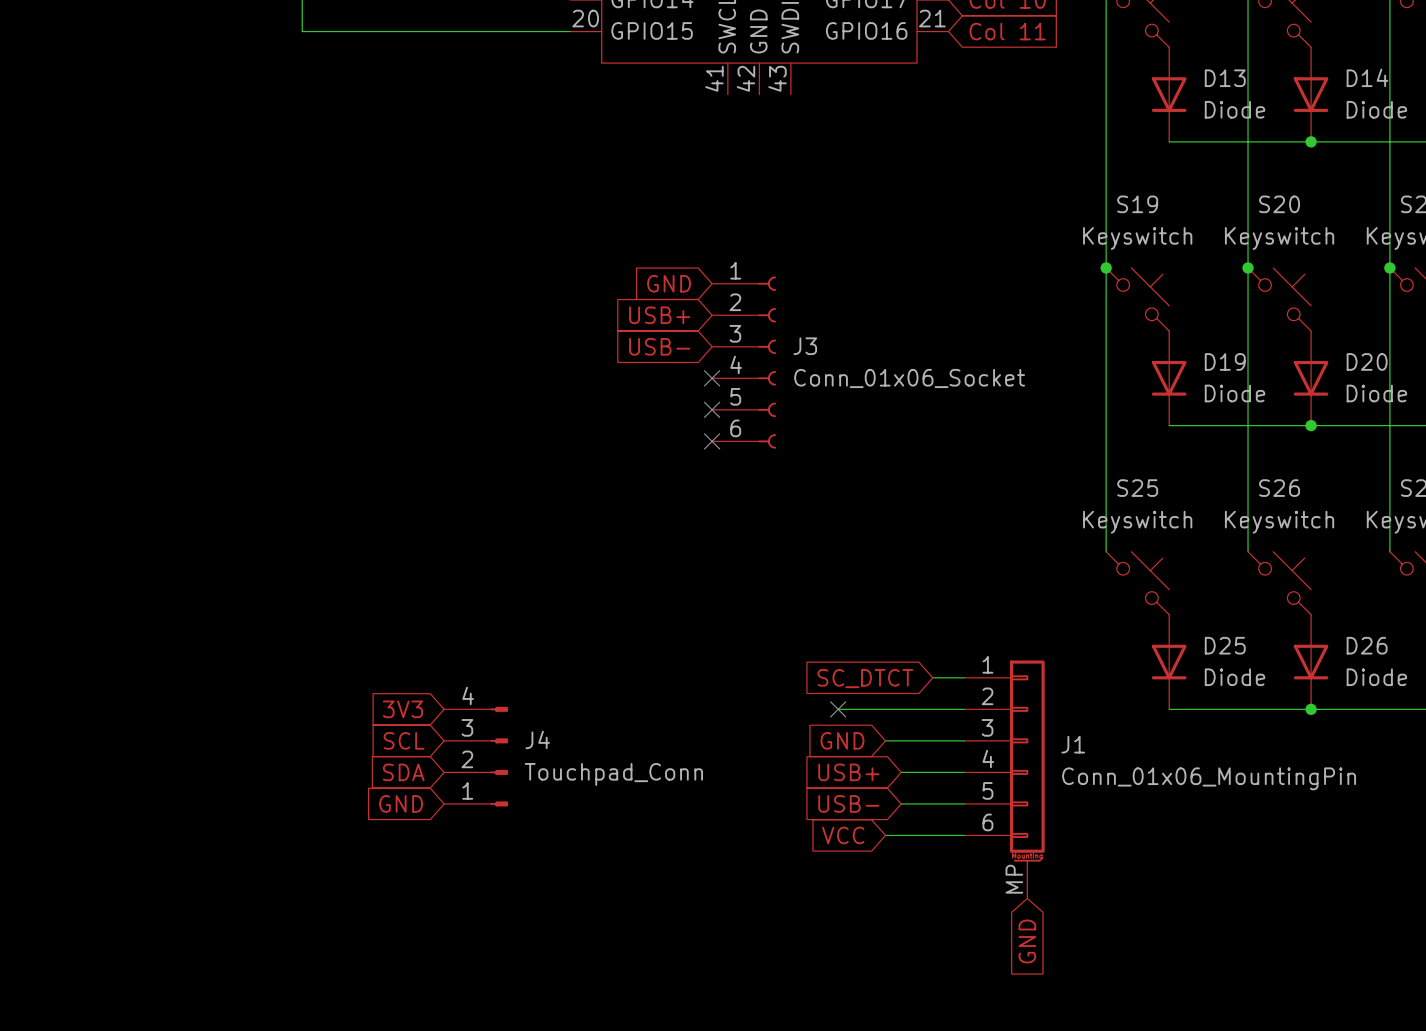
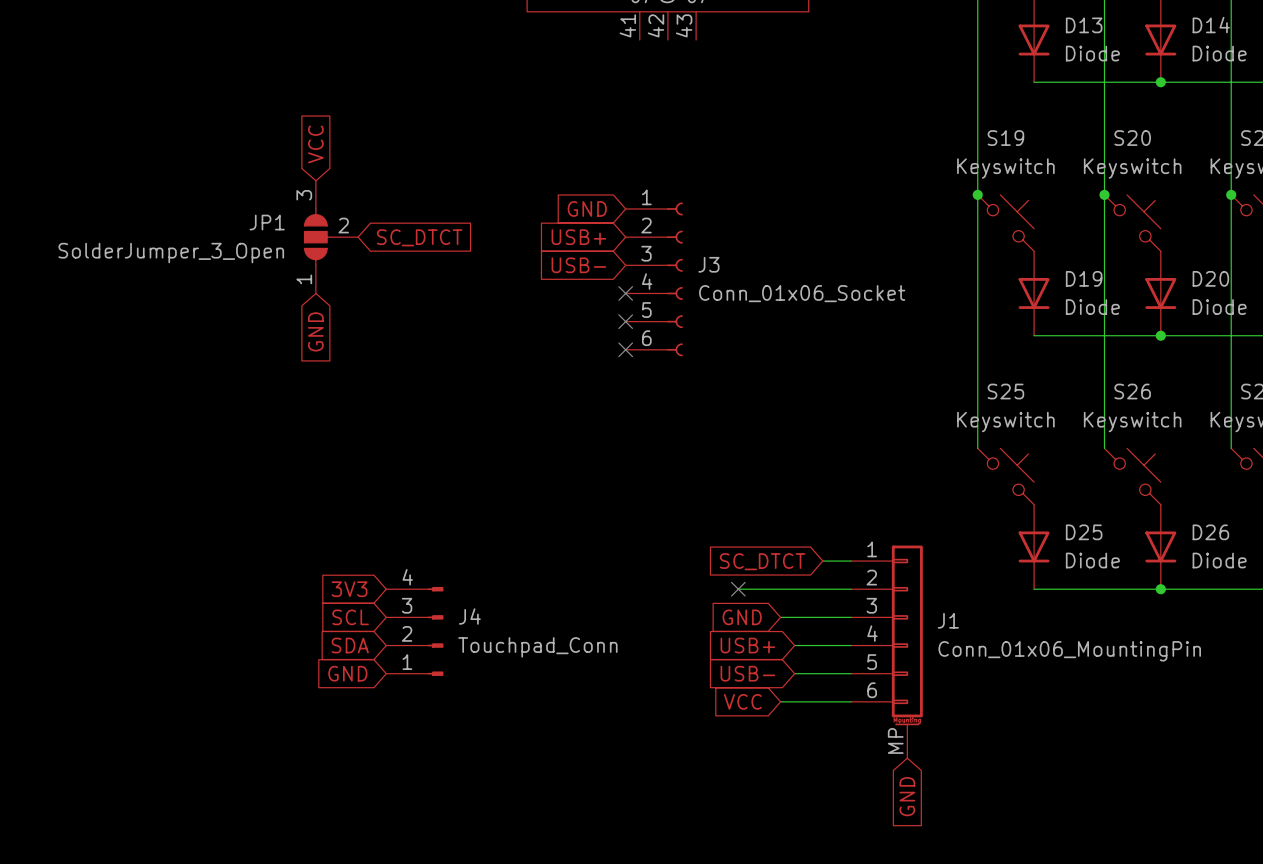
global label: none -> VCC (315, 144)
JP1: none -> SolderJumper_3_Open (331, 237)
global label: none -> SC_DTCT (419, 237)
global label: none -> GND (315, 331)

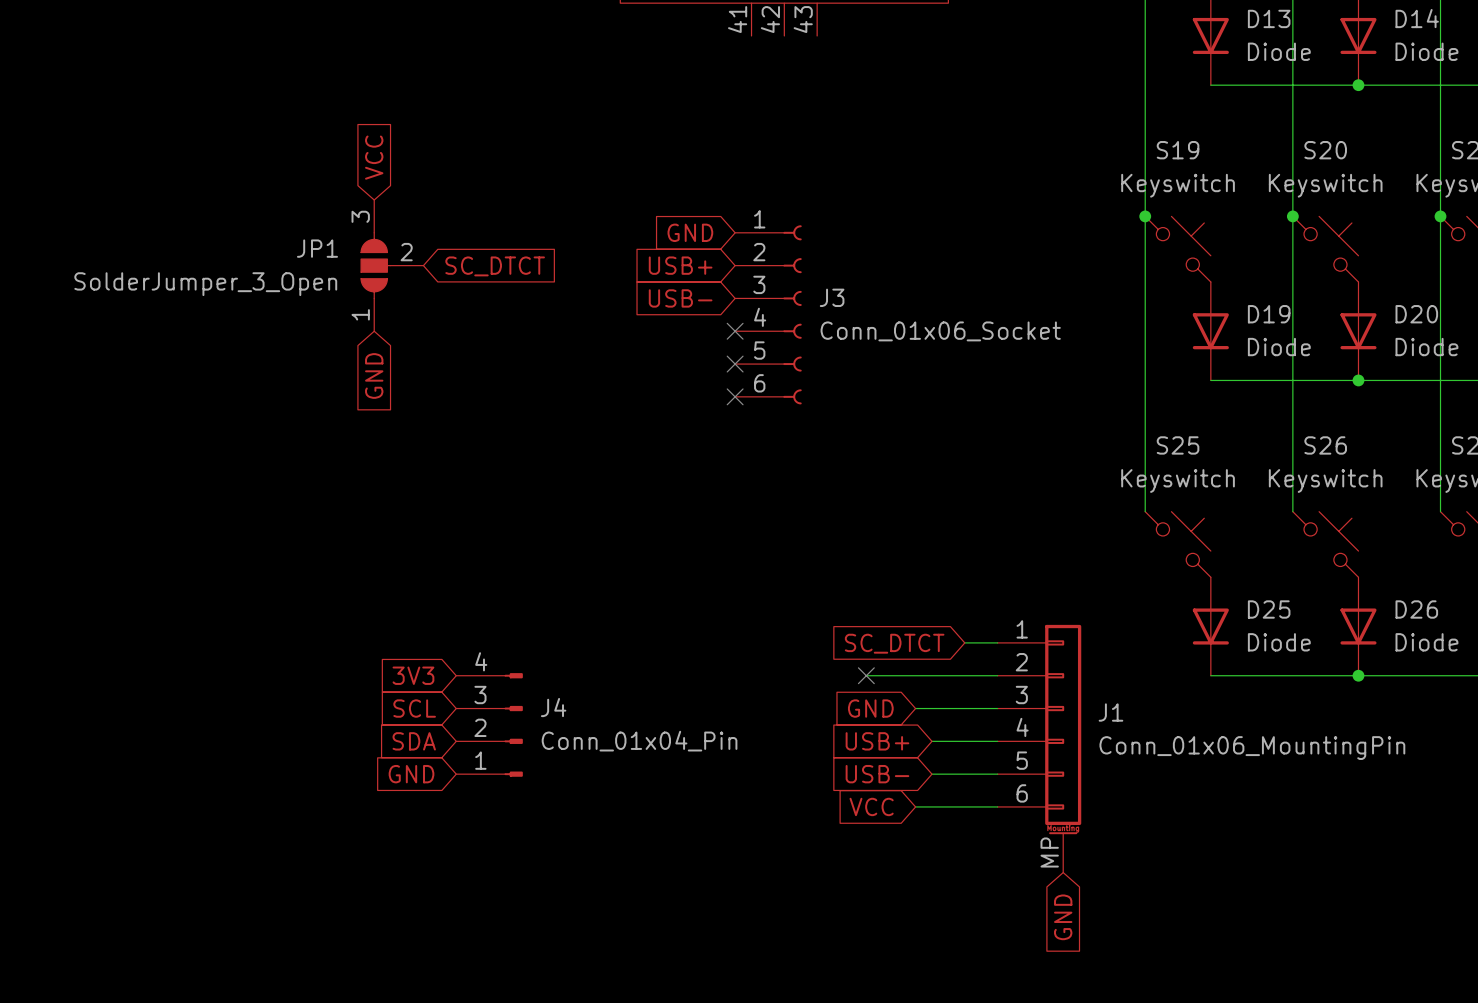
J4 value: Touchpad_Conn (537, 647) -> Conn_01x04_Pin (639, 741)

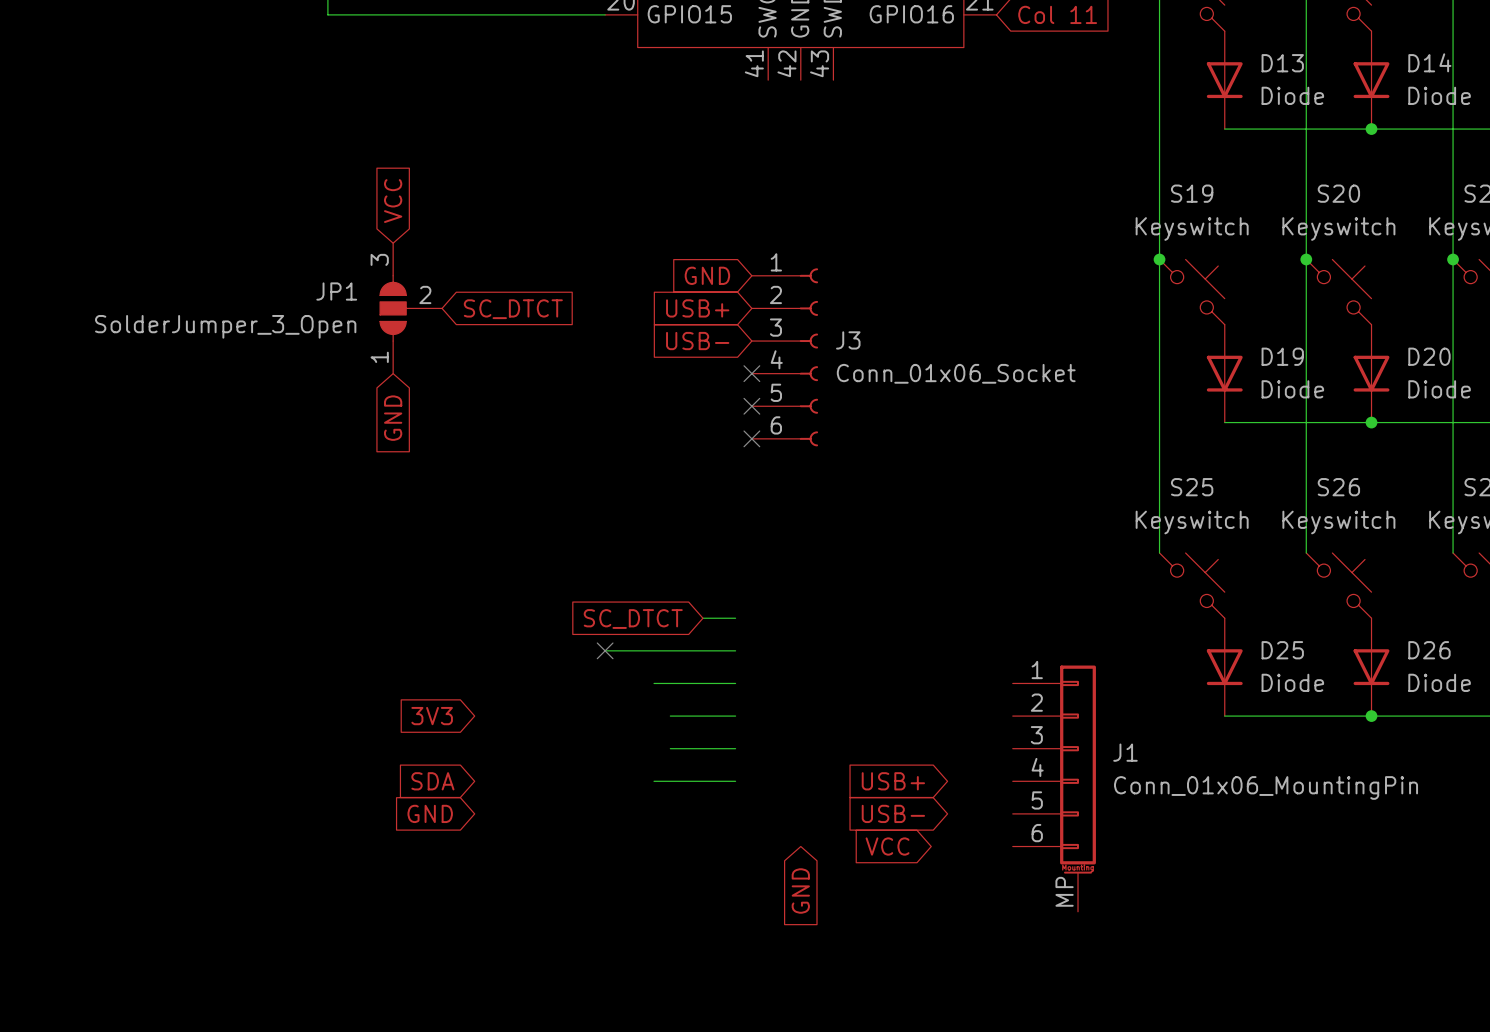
no-connect mark: none -> (605, 650)
wire: (964, 642) (997, 642) -> (702, 618) (735, 618)
global label position: SC_DTCT (894, 643) -> SC_DTCT (633, 619)
wire: (866, 675) (997, 675) -> (605, 650) (735, 650)
no-connect mark: (866, 675) -> none
global label: SCL (414, 708) -> none
global label: GND (870, 708) -> none
wire: (915, 708) (997, 708) -> (654, 683) (735, 683)
J4: Conn_01x04_Pin (489, 724) -> none
wire: (931, 741) (997, 741) -> (670, 716) (735, 716)
wire: (931, 774) (997, 774) -> (670, 748) (735, 748)
wire: (915, 806) (997, 806) -> (654, 781) (735, 781)
global label: none -> GND (800, 891)
global label: GND (1063, 917) -> none

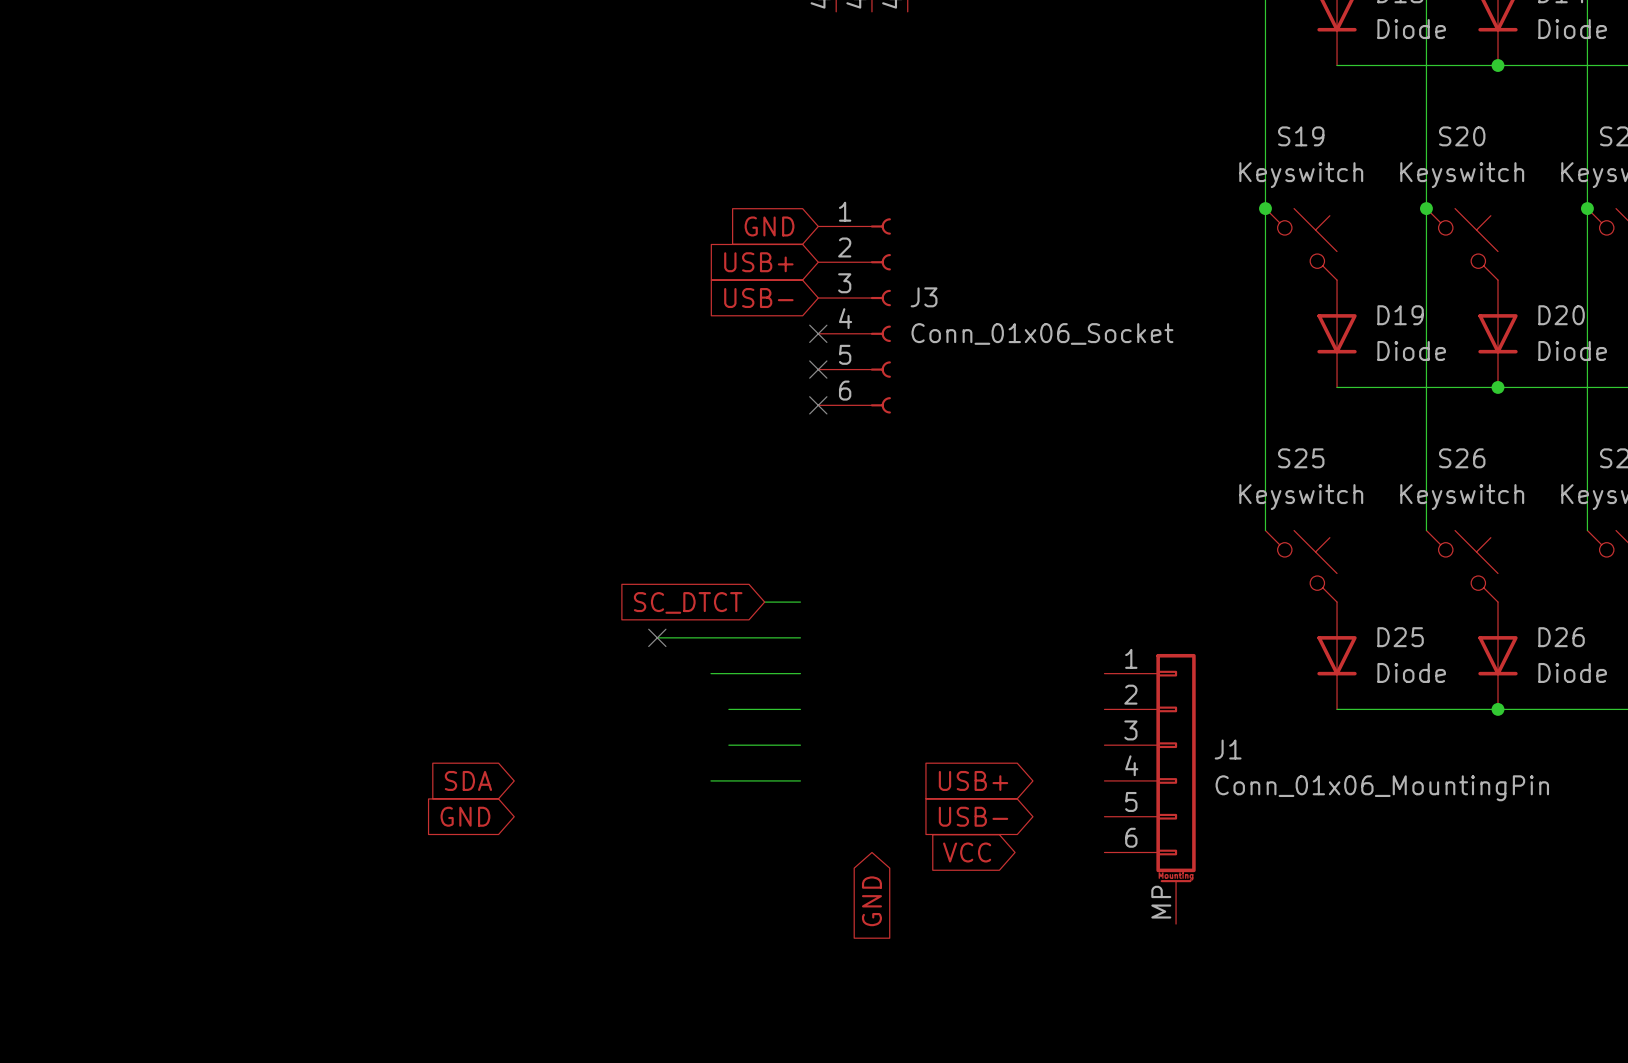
global label: VCC (393, 201) -> none
JP1: SolderJumper_3_Open (411, 308) -> none
global label: SC_DTCT (513, 309) -> none
global label: GND (393, 418) -> none
global label: 3V3 (432, 716) -> none

